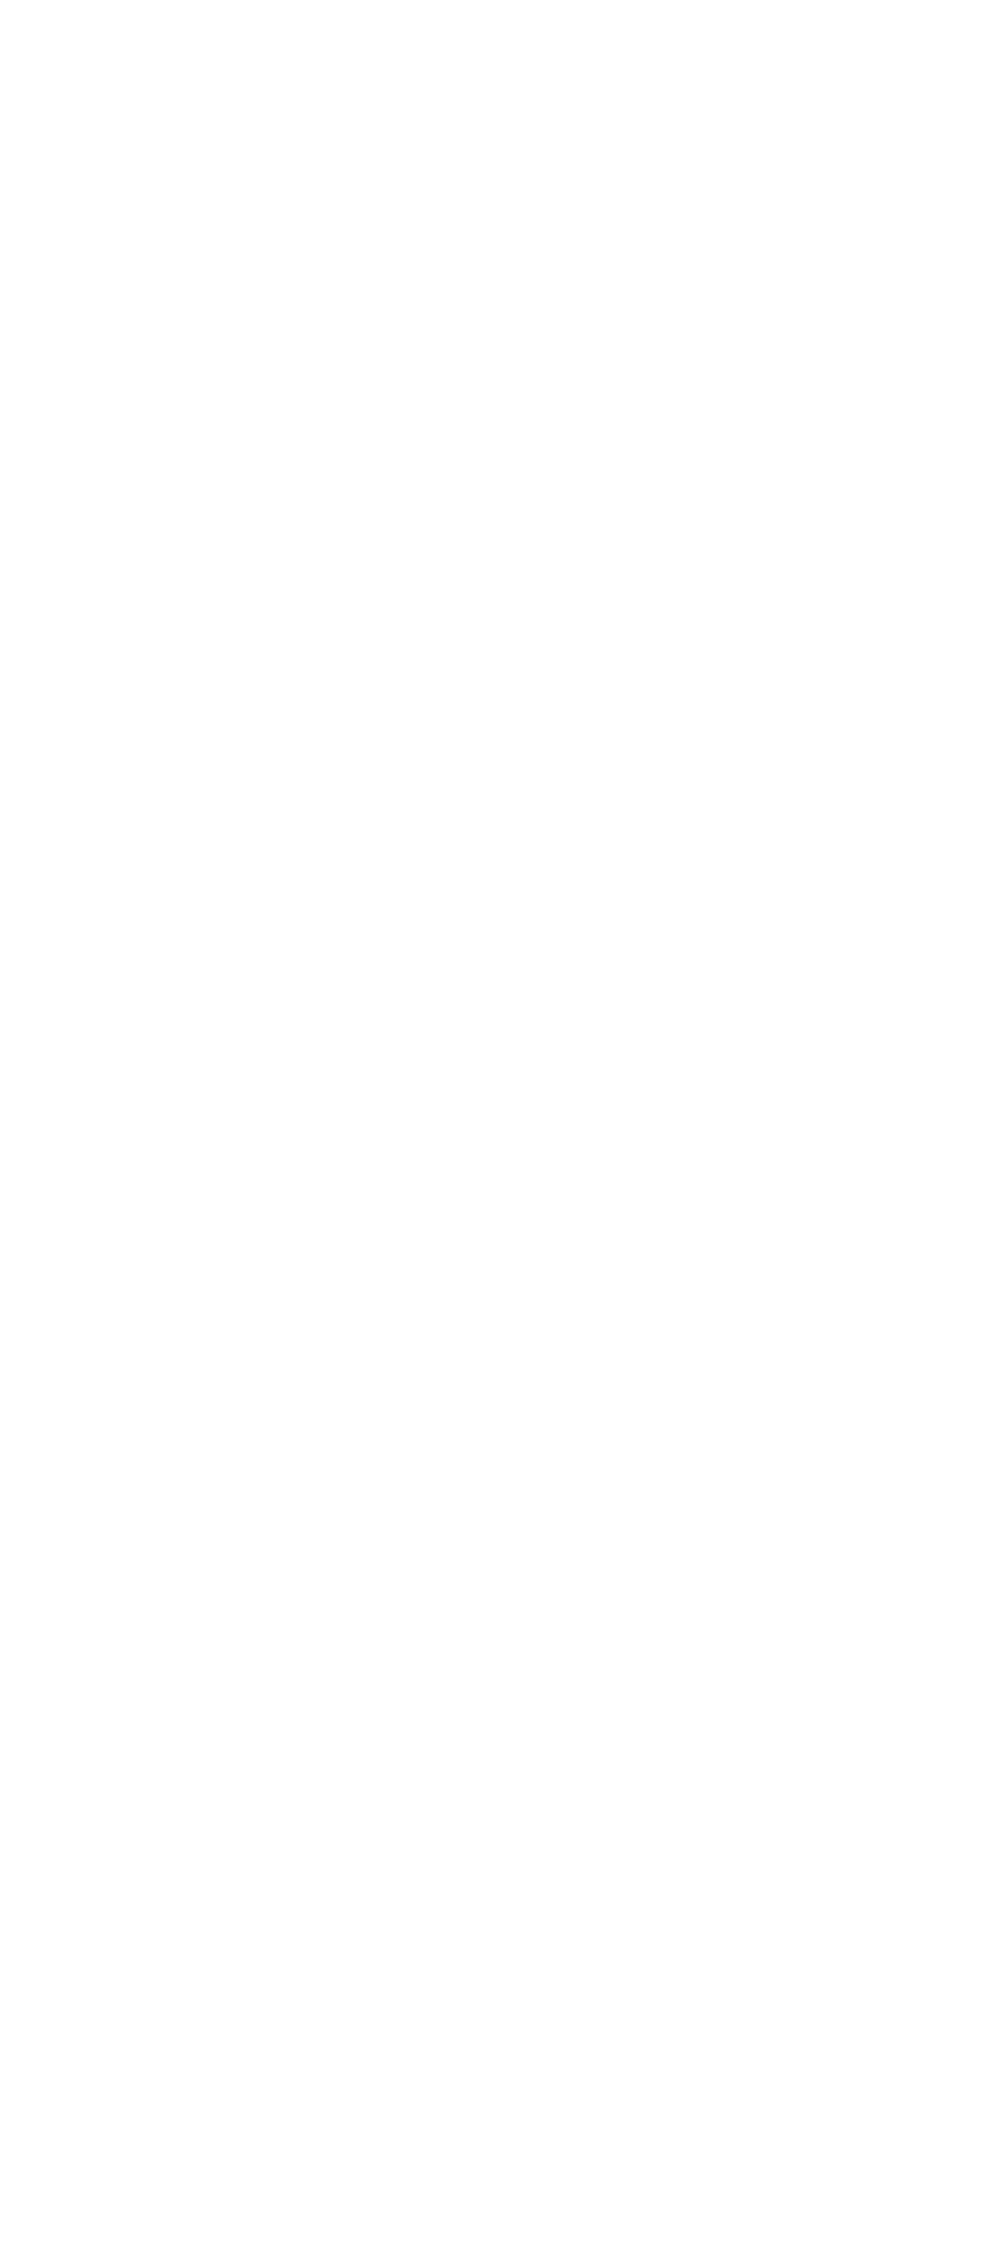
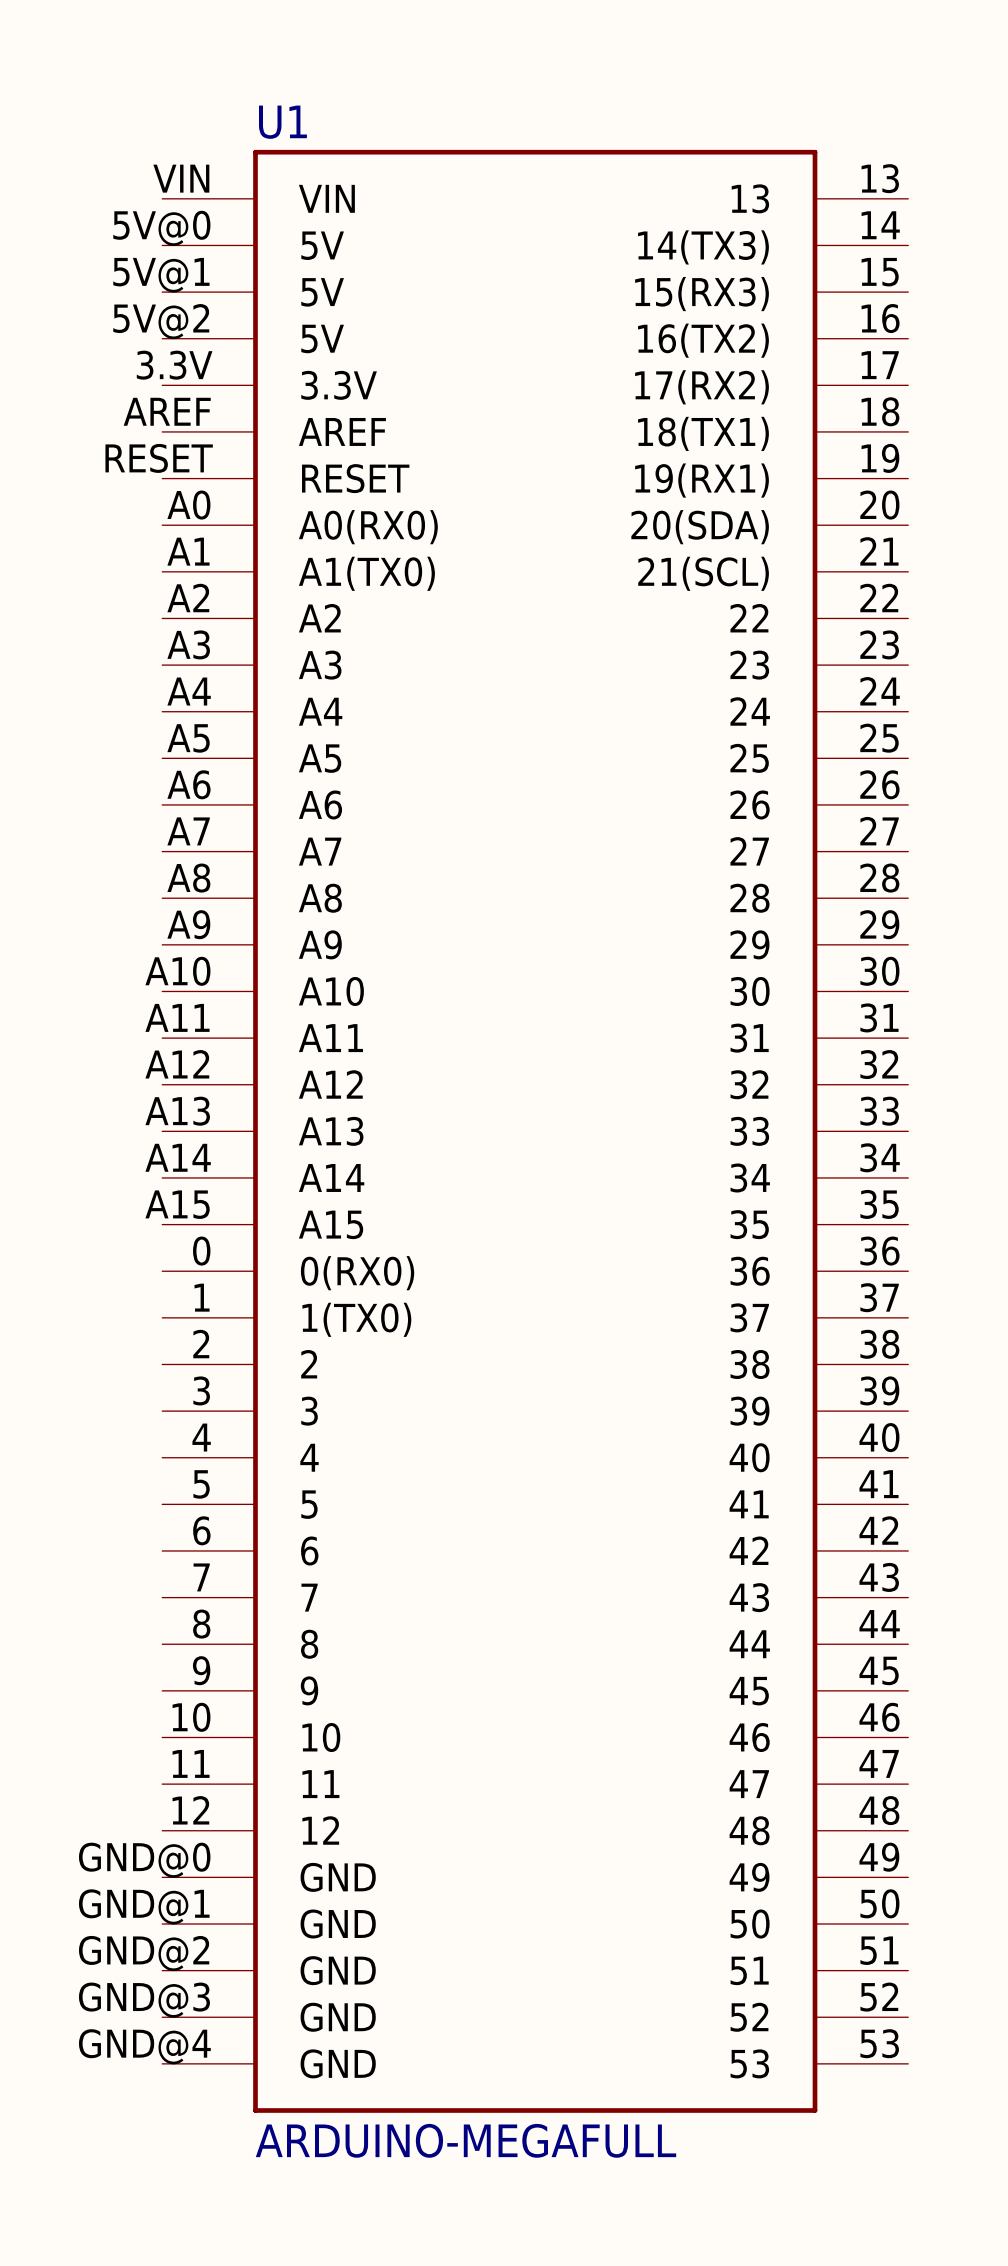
U1: none -> ARDUINO-MEGAFULL (535, 1131)

